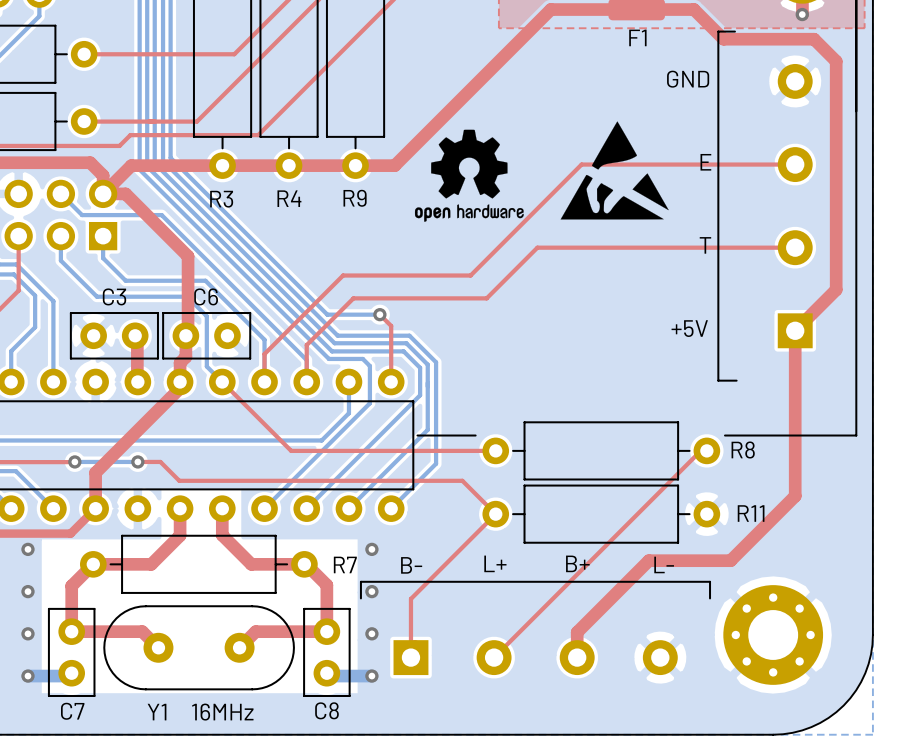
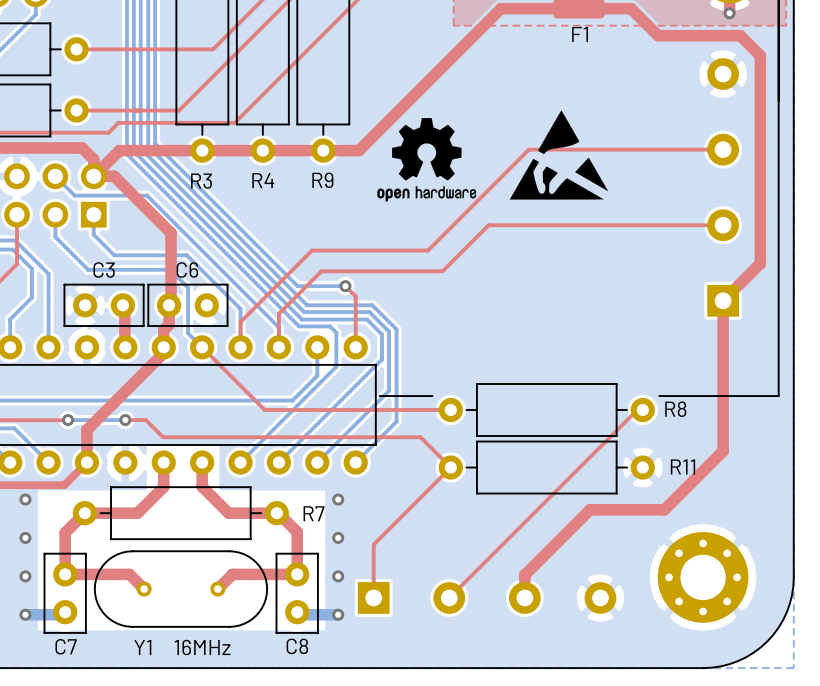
line: (734, 31) (718, 31) (718, 380) (736, 380) -> none
text: GND (688, 79) -> none
text: E (705, 162) -> none
text: T (705, 245) -> none
text: +5V (689, 328) -> none
text: L+ (495, 563) -> none
text: B+ (577, 563) -> none
text: L- (664, 564) -> none
text: B- (411, 565) -> none
line: (360, 598) (360, 581) (710, 581) (710, 598) -> none
Y1 footprint: [103, 605, 295, 691] -> [94, 550, 268, 628]

